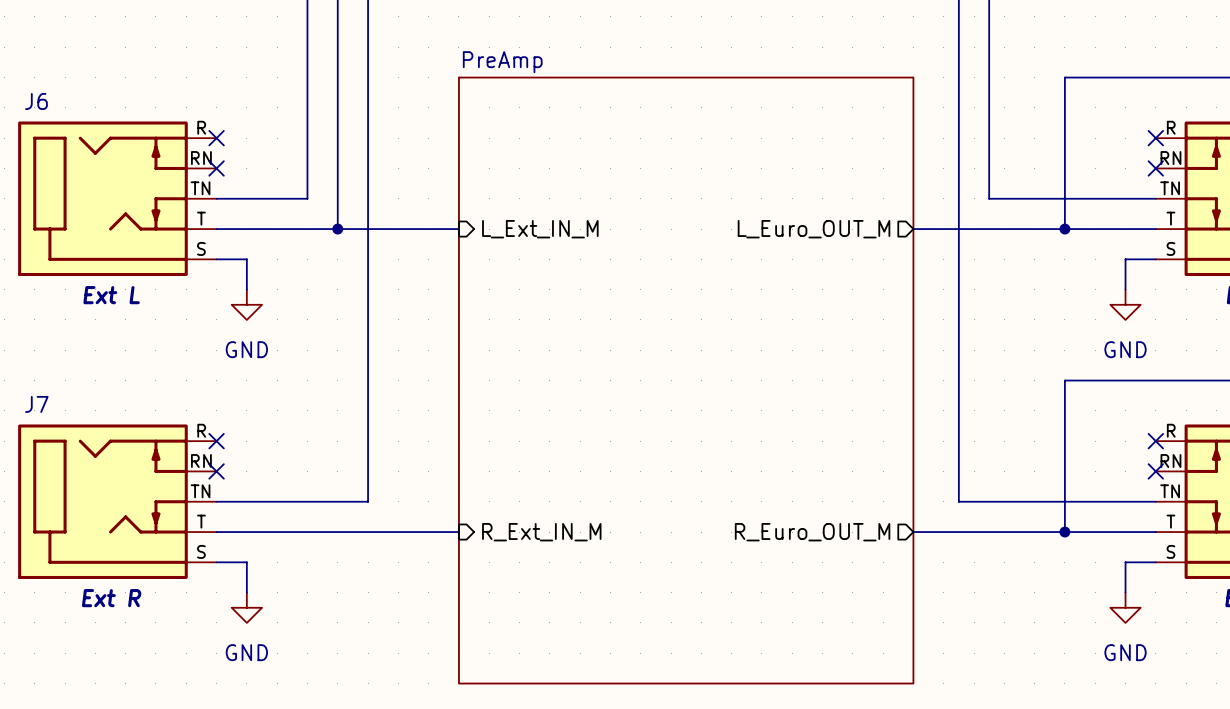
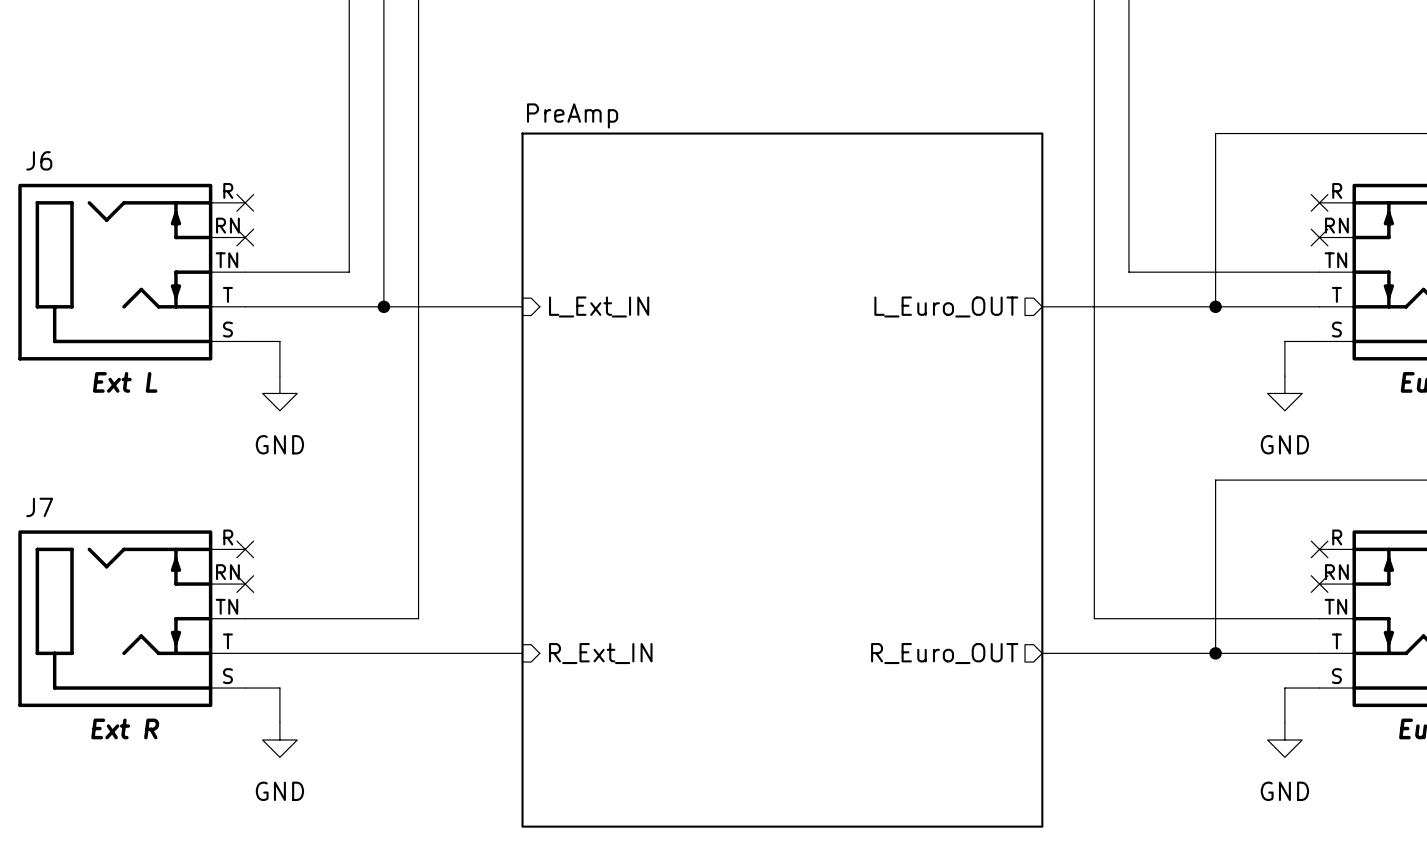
sheet pin: L_Ext_IN_M (540, 229) -> L_Ext_IN (599, 306)
sheet pin: L_Euro_OUT_M (814, 229) -> L_Euro_OUT (946, 306)
sheet pin: R_Ext_IN_M (541, 532) -> R_Ext_IN (600, 653)
sheet pin: R_Euro_OUT_M (812, 532) -> R_Euro_OUT (944, 653)

